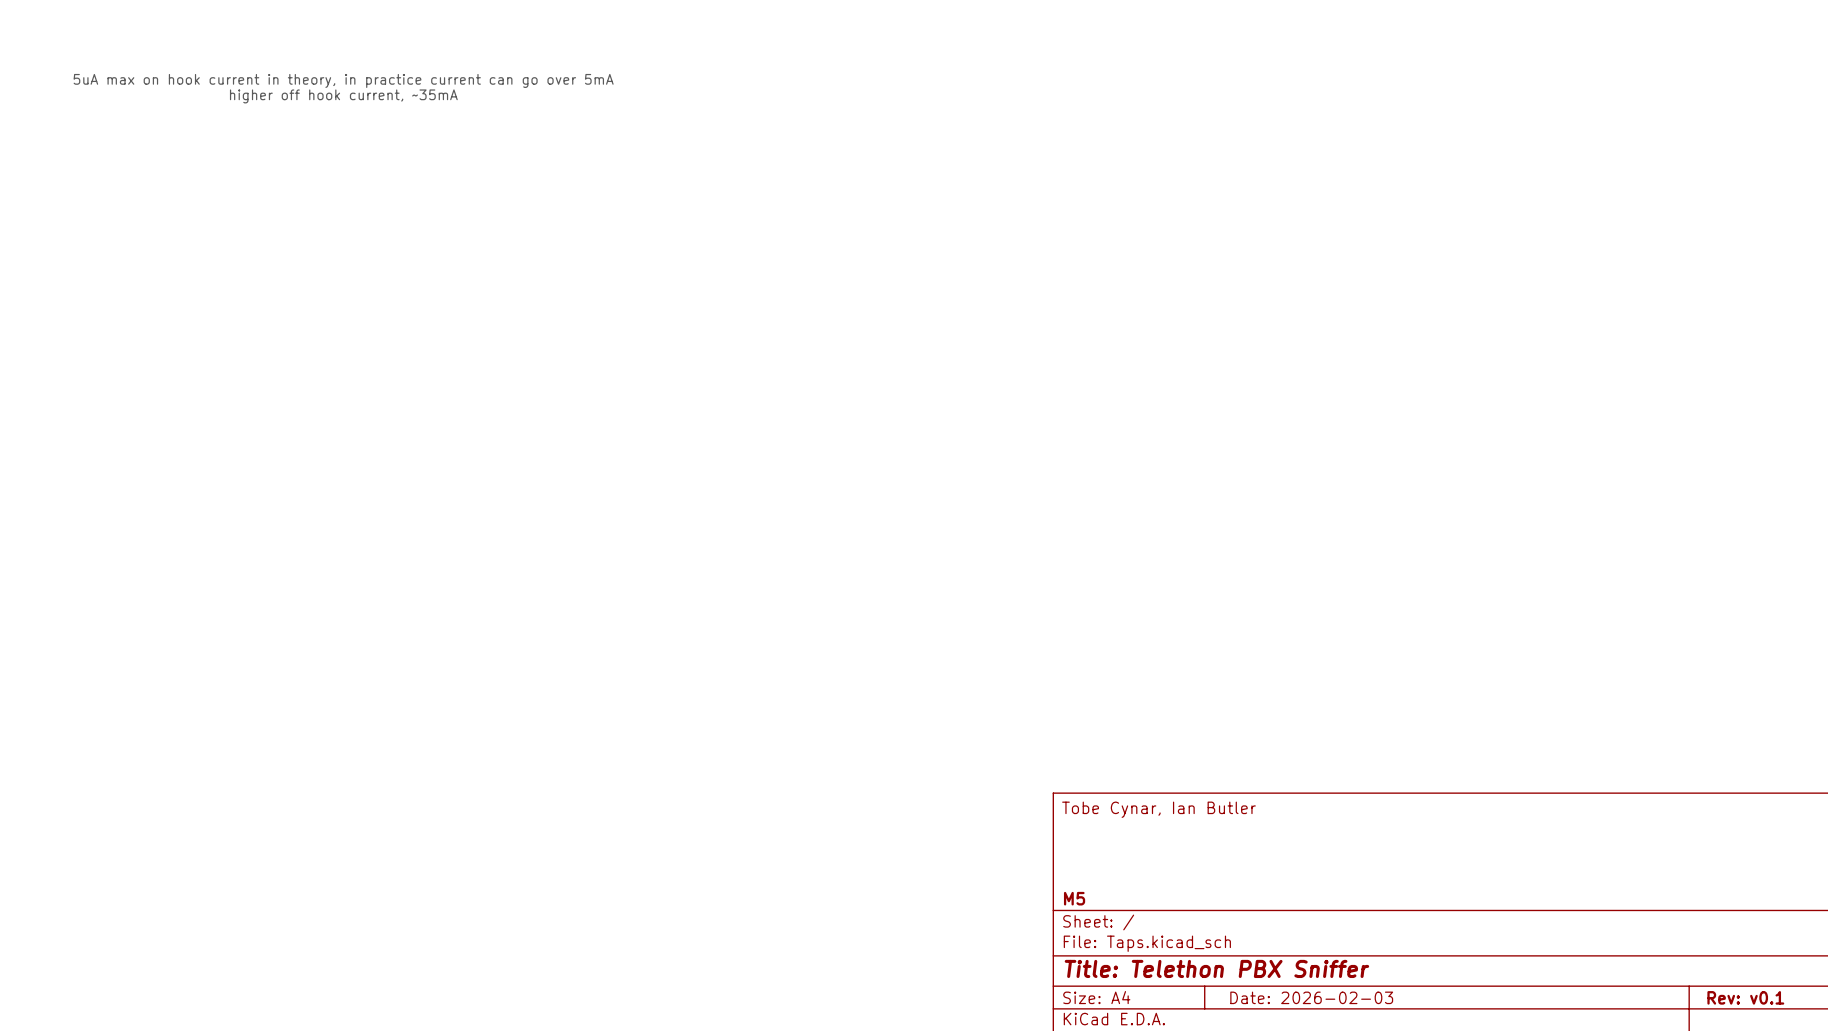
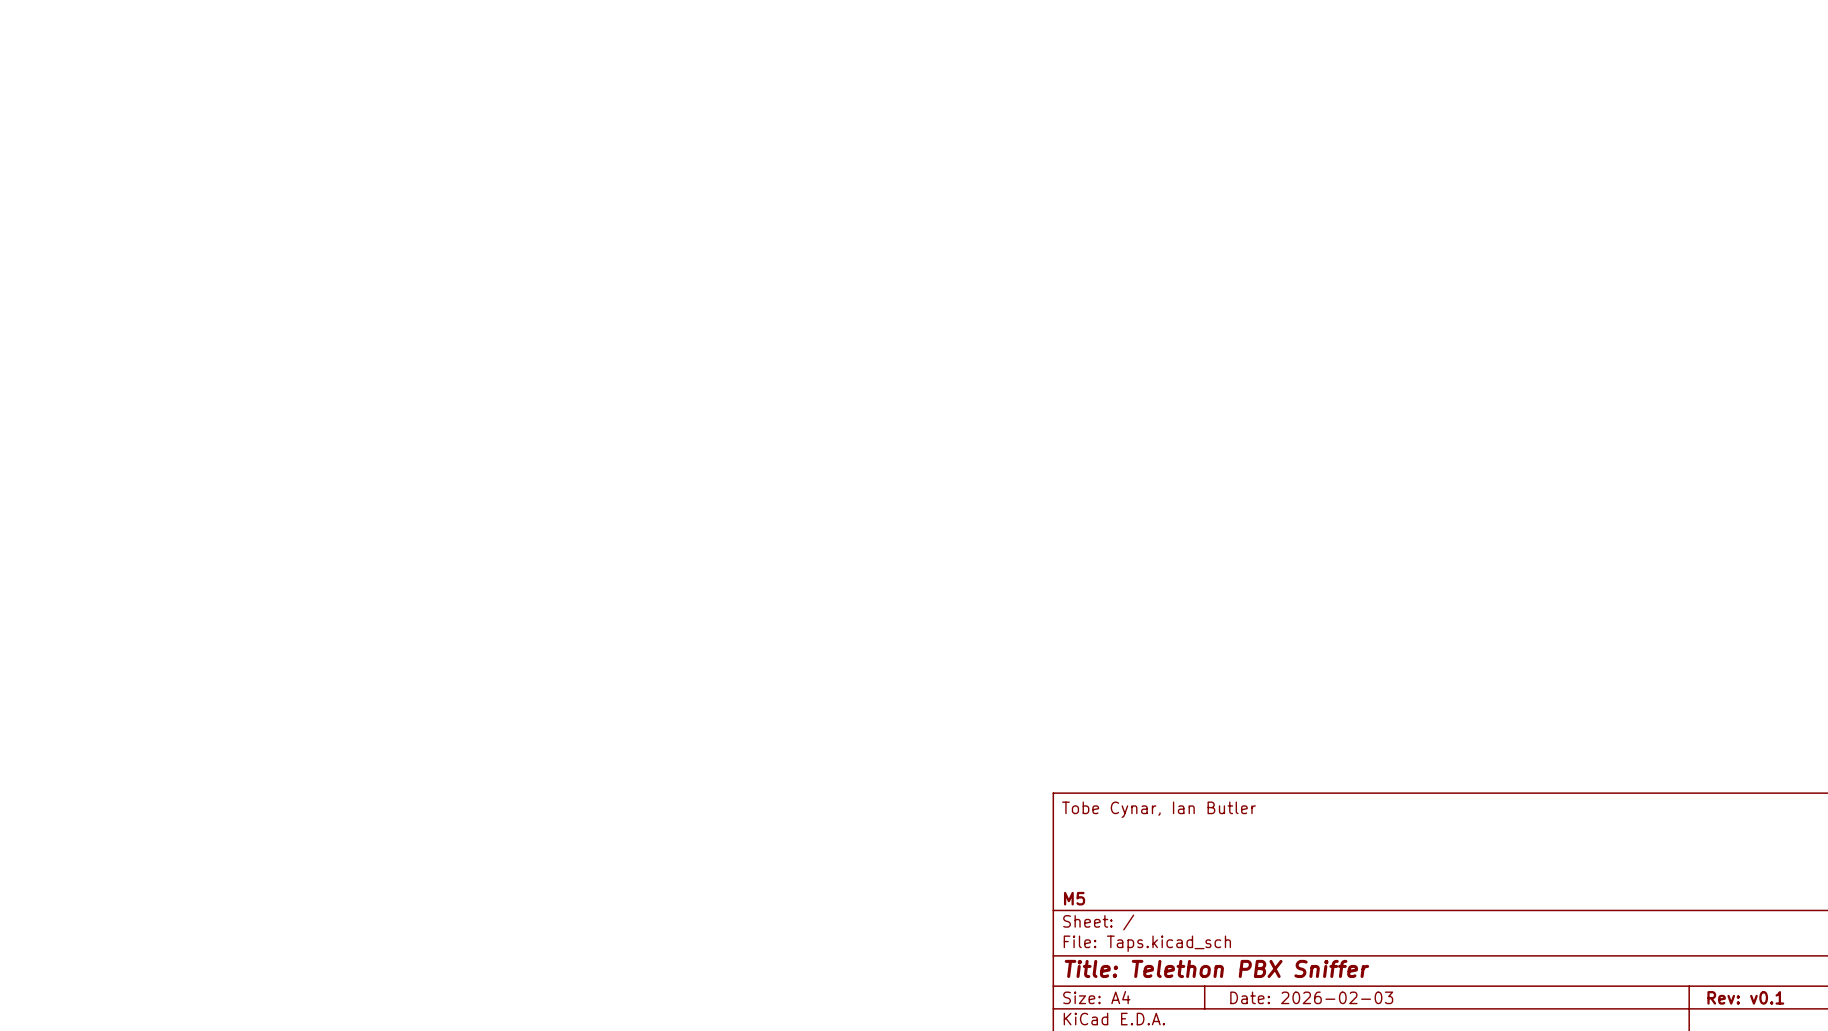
text: 5uA max on hook current in theory, in practice current can go over 5mA (343, 80) -> none
text: higher off hook current, ~35mA (343, 96) -> none

